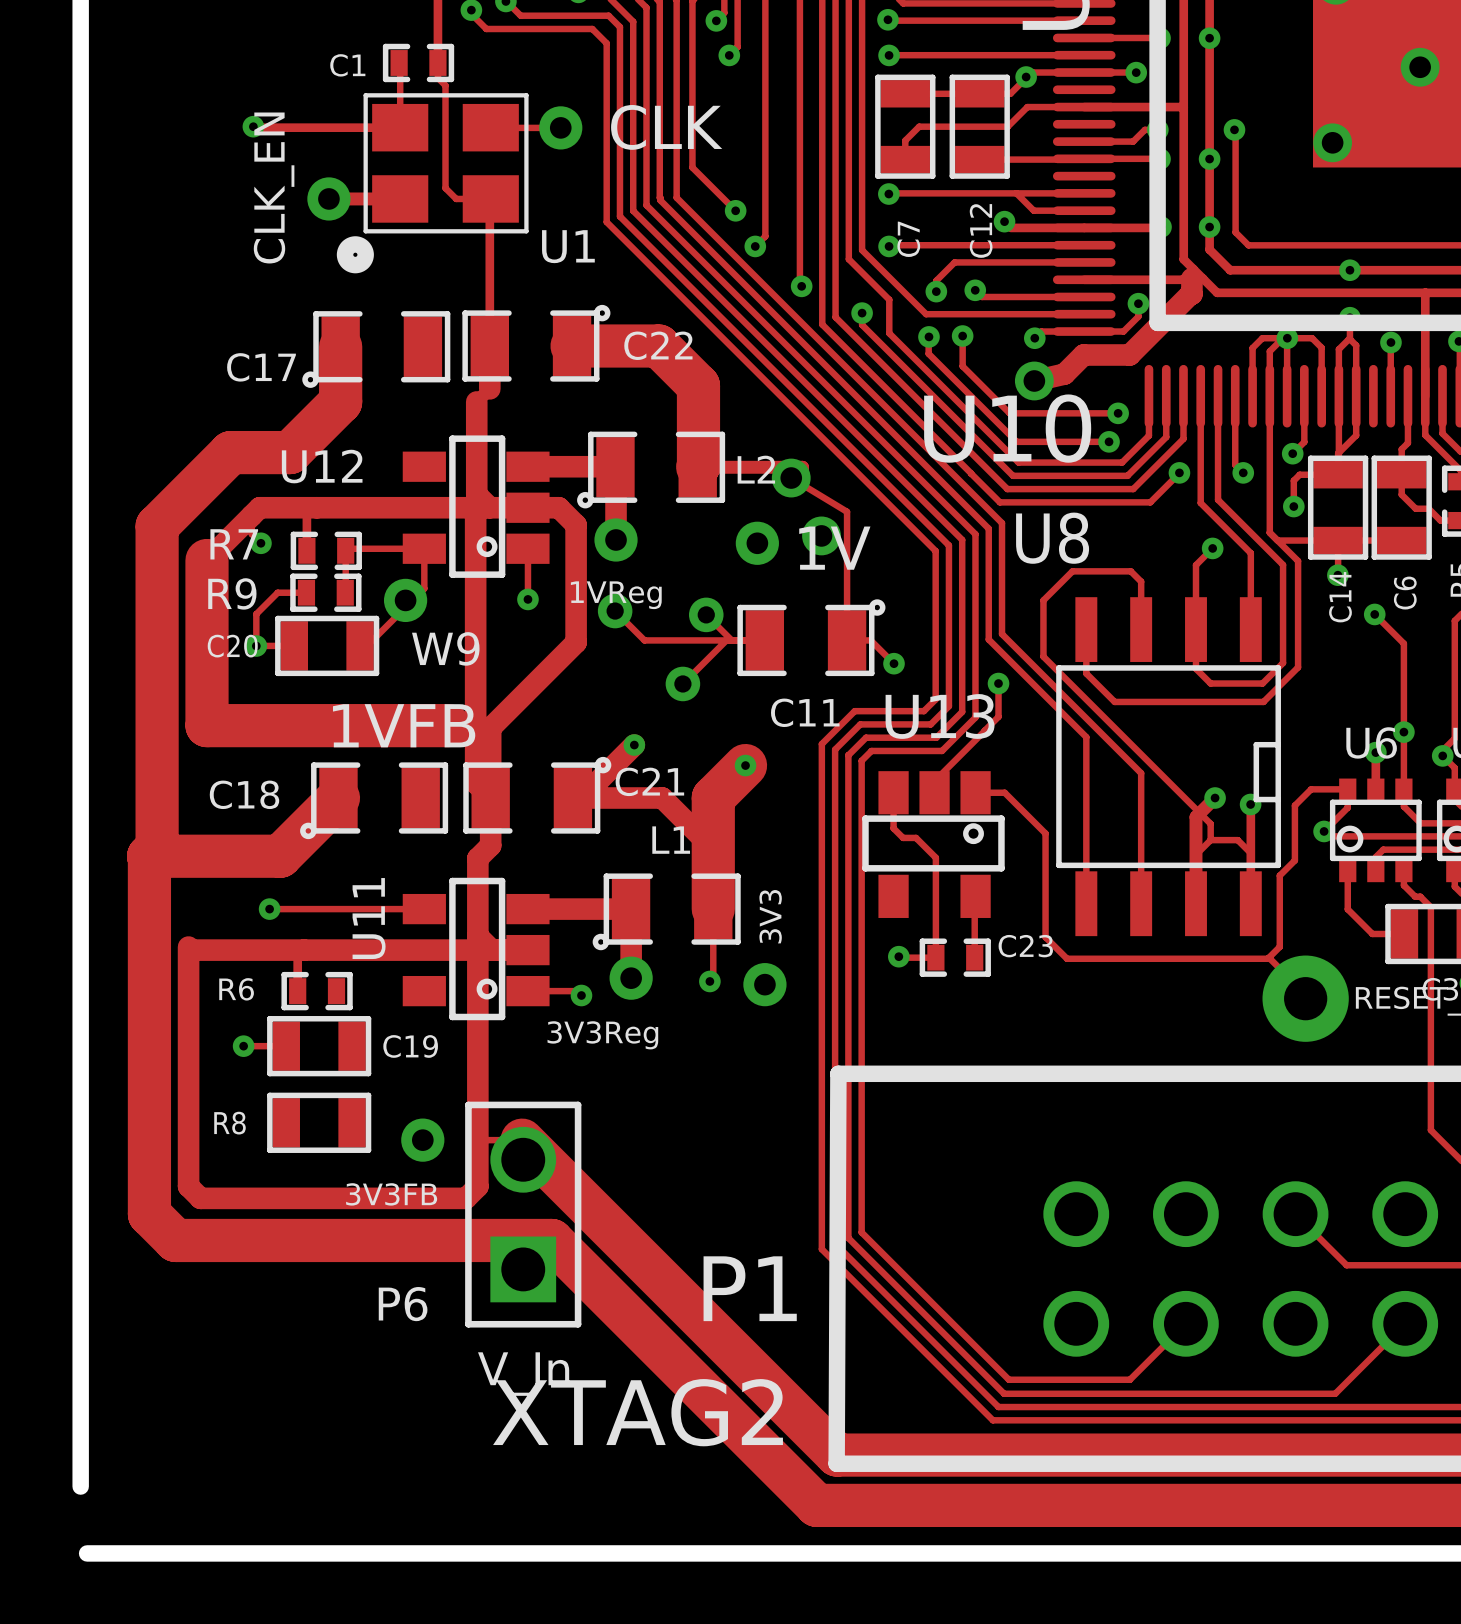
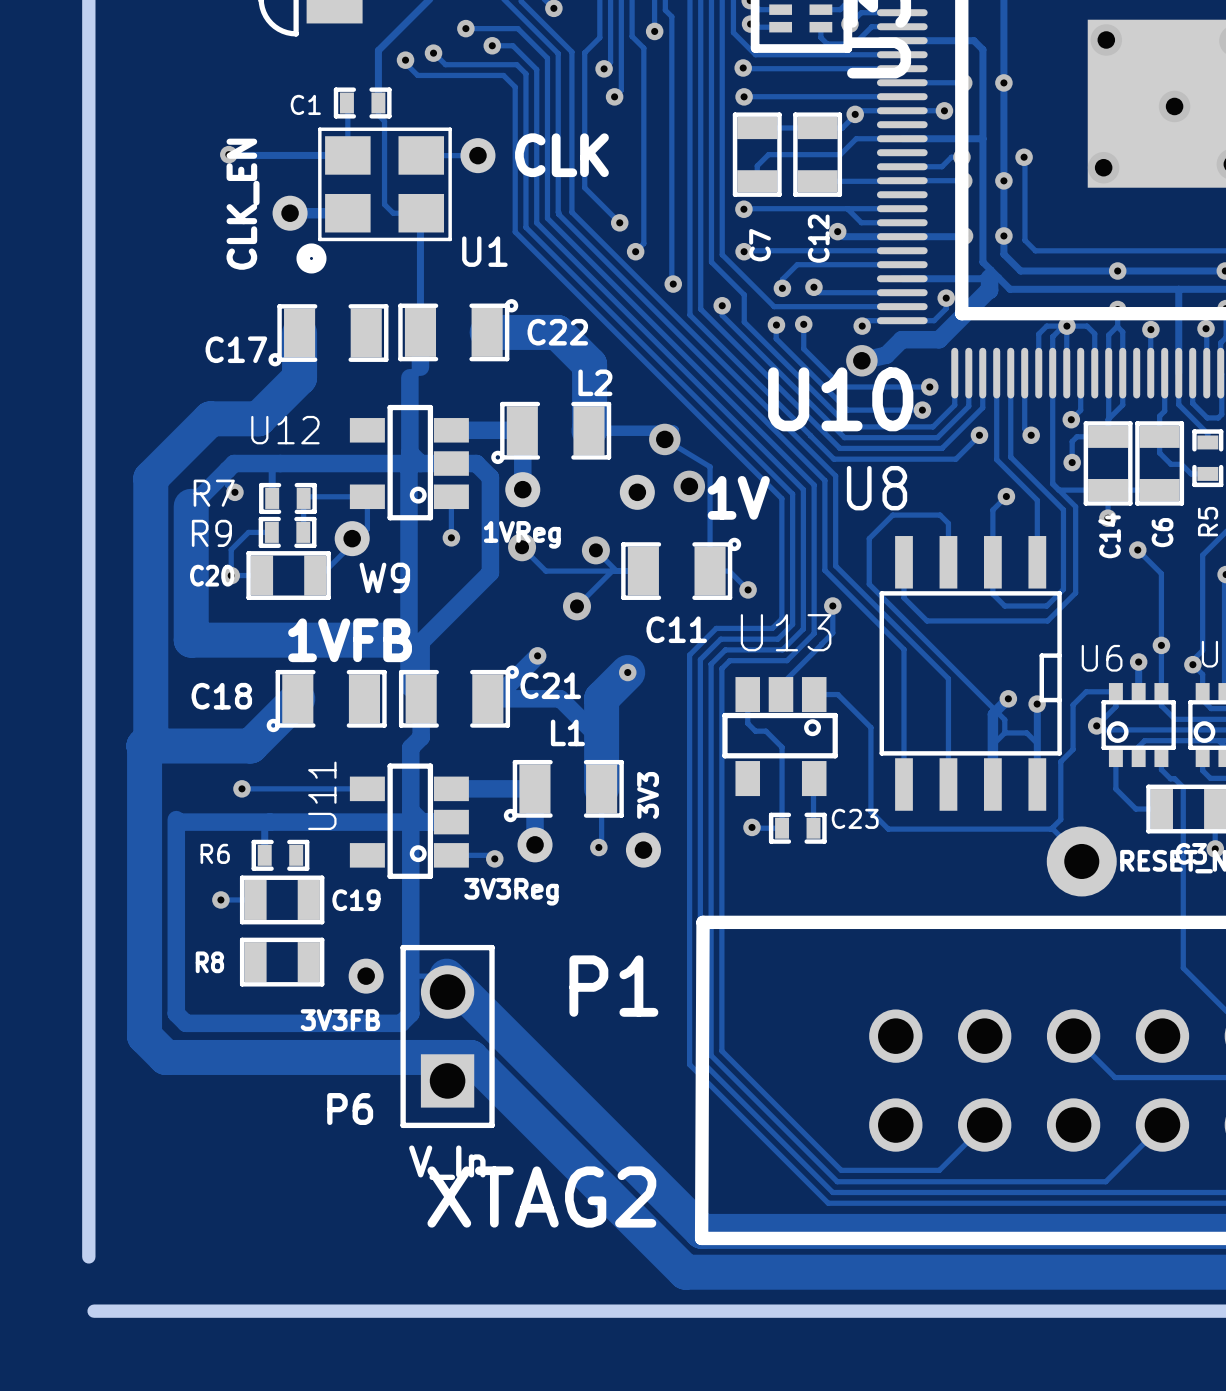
L2 name position: L2 (756, 469) -> L2 (595, 382)
part value position: 1V (834, 548) -> 1V (738, 497)
U6 name position: U6 (1371, 742) -> U6 (1102, 658)
P1 name position: P1 (750, 1288) -> P1 (613, 986)

